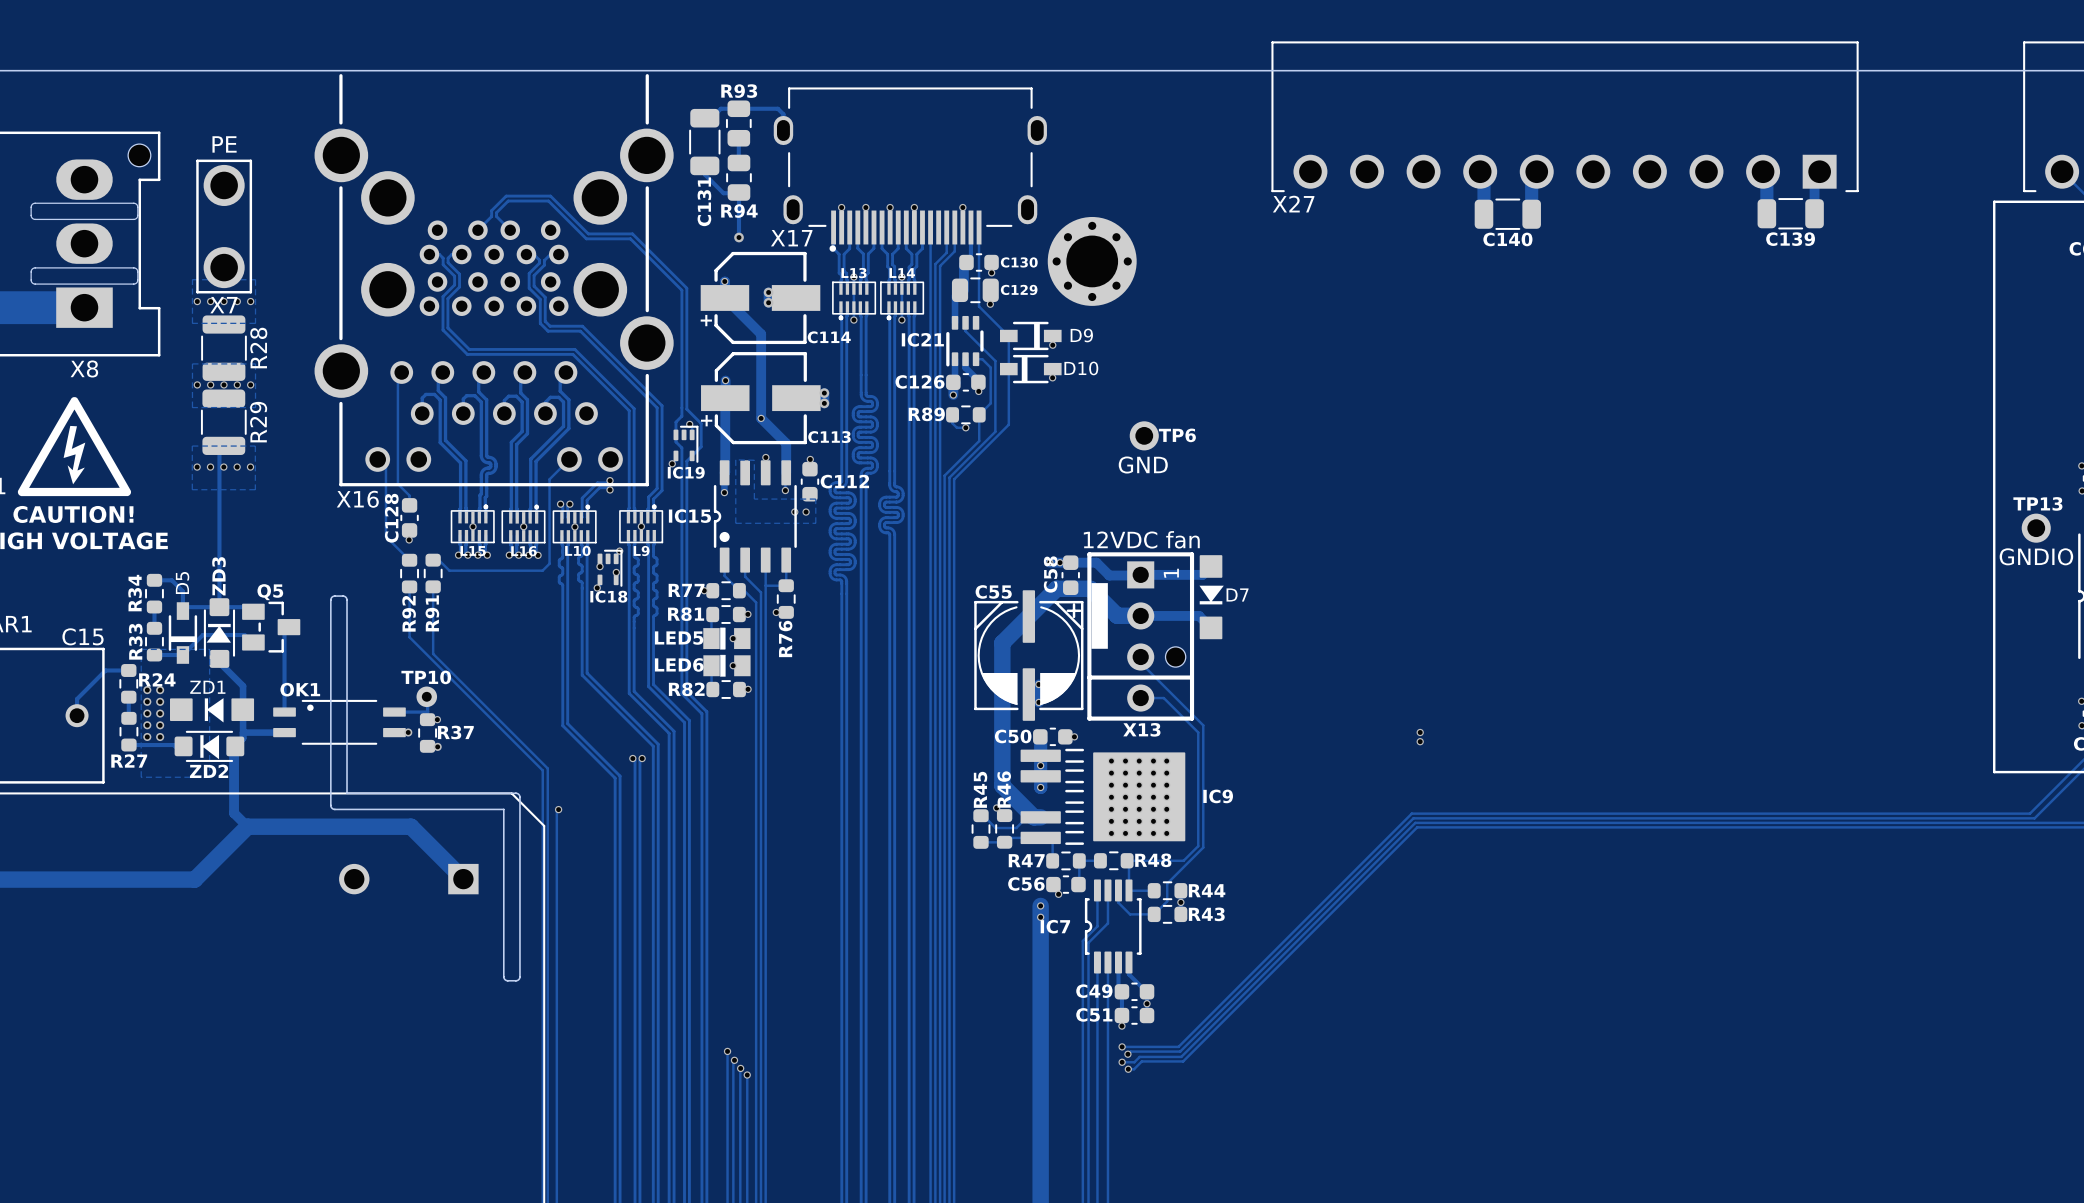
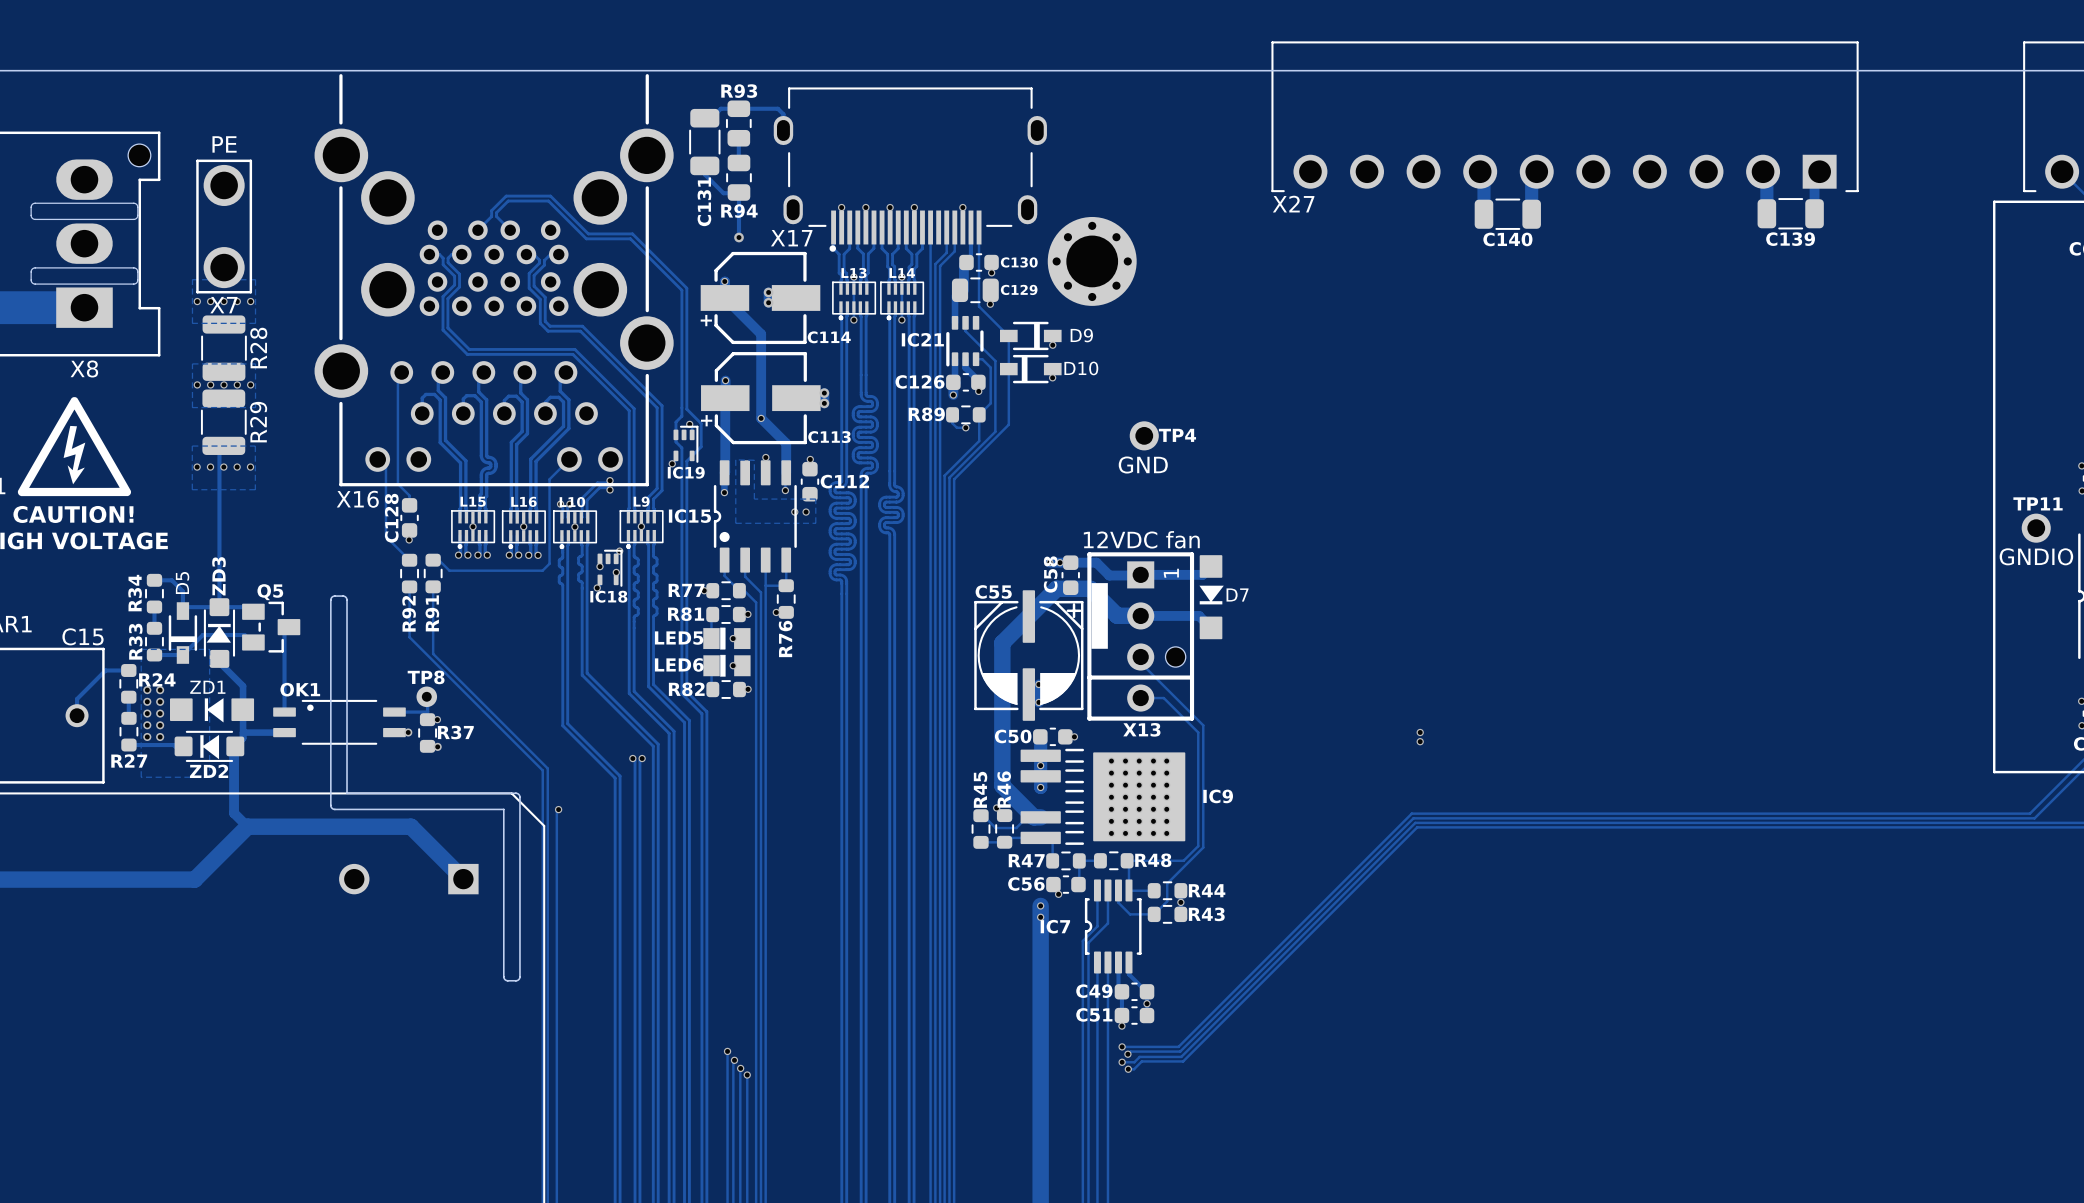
TP6 name: TP6 (1177, 435) -> TP4 (1177, 435)
TP13 name: TP13 (2037, 503) -> TP11 (2038, 503)
L15 rotation: 0° (472, 523) -> 180° (473, 529)
L9 rotation: 0° (641, 523) -> 180° (641, 529)
L16 rotation: 0° (523, 524) -> 180° (523, 529)
L10 rotation: 0° (574, 524) -> 180° (575, 529)
TP10 name: TP10 (426, 677) -> TP8 (426, 677)

